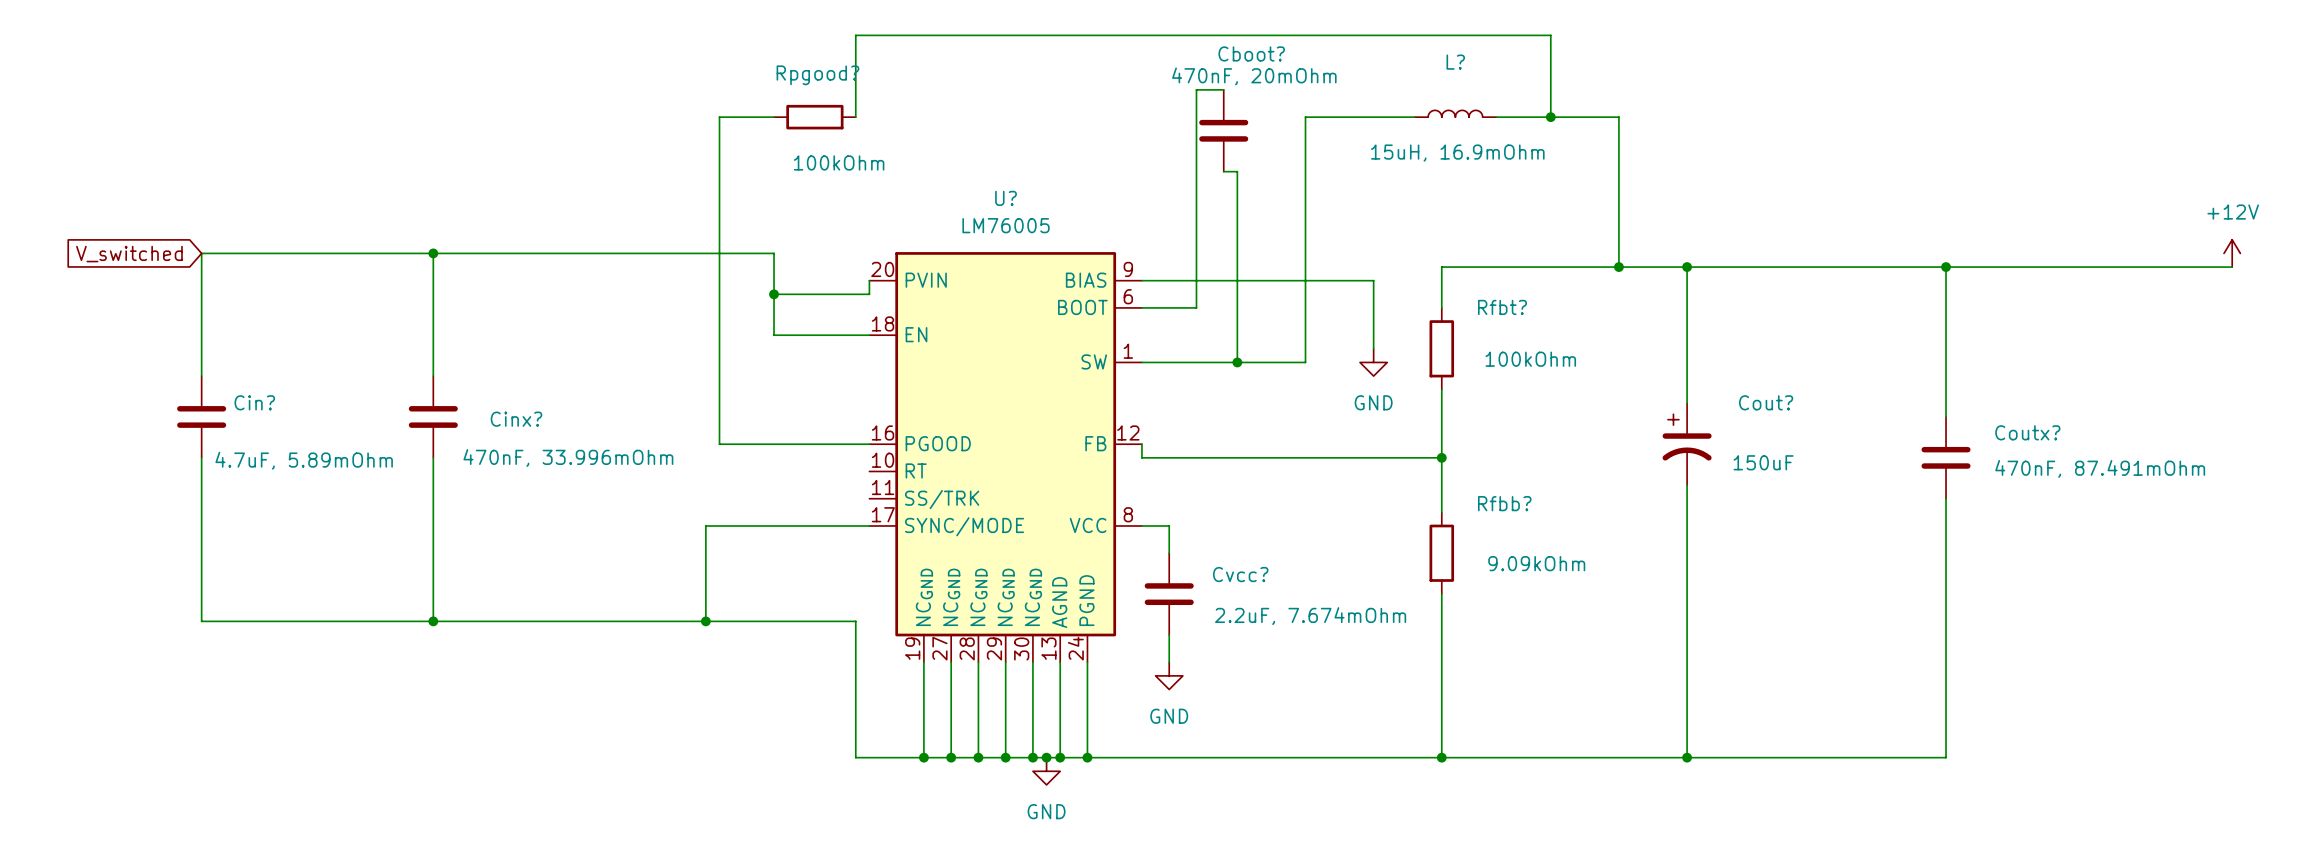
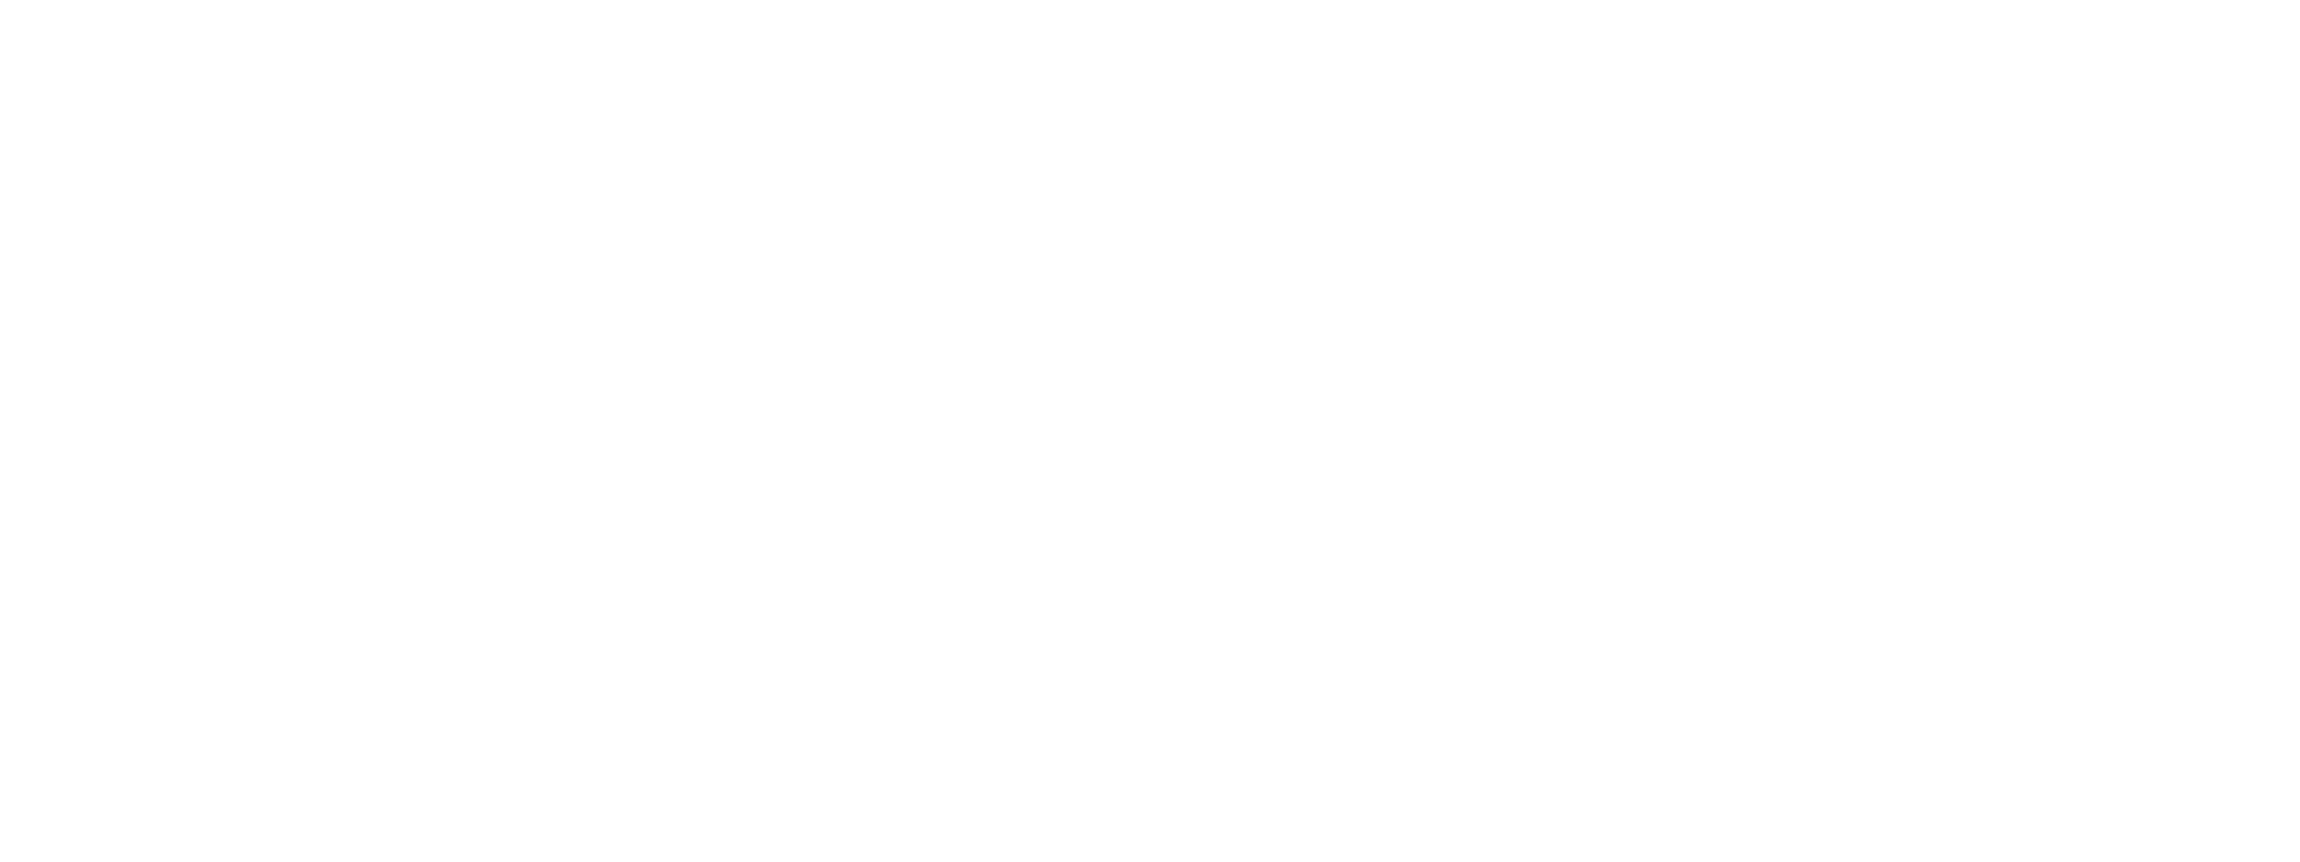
wire: (1223, 89) (1196, 89) (1196, 307) (1141, 307) -> none
L?: 15uH, 16.9mOhm (1455, 113) -> none
wire: (774, 117) (719, 117) (719, 444) (869, 444) -> none
Rpgood?: 100kOhm (814, 117) -> none
wire: (855, 117) (855, 35) (1550, 35) (1550, 117) -> none
wire: (1414, 117) (1305, 117) (1305, 362) (1141, 362) -> none
wire: (1496, 117) (1618, 117) (1618, 267) -> none
junction: (1550, 117) -> none
Cboot?: 470nF, 20mOhm (1223, 130) -> none
wire: (1223, 171) (1237, 171) (1237, 362) -> none
wire: (433, 253) (433, 376) -> none
junction: (433, 253) -> none
power symbol: +12V (2232, 253) -> none
global label: V_switched (129, 254) -> none
junction: (1618, 267) -> none
wire: (1687, 267) (1687, 403) -> none
junction: (1687, 267) -> none
wire: (1946, 267) (1946, 416) -> none
junction: (1946, 267) -> none
wire: (2232, 267) (1441, 267) (1441, 307) -> none
wire: (869, 280) (869, 294) (774, 294) -> none
wire: (1141, 280) (1373, 280) (1373, 348) -> none
junction: (774, 294) -> none
wire: (869, 335) (774, 335) (774, 253) (201, 253) (201, 376) -> none
Rfbt?: 100kOhm (1441, 348) -> none
junction: (1237, 362) -> none
power symbol: GND (1373, 362) -> none
wire: (1441, 389) (1441, 512) -> none
Cin?: 4.7uF, 5.89mOhm (201, 416) -> none
Cinx?: 470nF, 33.996mOhm (433, 416) -> none
wire: (1141, 444) (1141, 457) (1441, 457) -> none
Cout?: 150uF (1687, 444) -> none
wire: (201, 457) (201, 621) (855, 621) (855, 757) (1946, 757) (1946, 498) -> none
wire: (433, 457) (433, 621) -> none
U?: LM76005 (1005, 457) -> none
junction: (1441, 457) -> none
Coutx?: 470nF, 87.491mOhm (1946, 457) -> none
wire: (1687, 485) (1687, 757) -> none
wire: (869, 525) (705, 525) (705, 621) -> none
wire: (1141, 525) (1169, 525) (1169, 553) -> none
Rfbb?: 9.09kOhm (1441, 553) -> none
Cvcc?: 2.2uF, 7.674mOhm (1169, 594) -> none
wire: (1441, 594) (1441, 757) -> none
junction: (433, 621) -> none
junction: (705, 621) -> none
wire: (1169, 635) (1169, 662) -> none
wire: (923, 662) (923, 757) -> none
wire: (951, 662) (951, 757) -> none
wire: (978, 662) (978, 757) -> none
wire: (1005, 662) (1005, 757) -> none
wire: (1032, 662) (1032, 757) -> none
wire: (1060, 662) (1060, 757) -> none
wire: (1087, 662) (1087, 757) -> none
power symbol: GND (1169, 675) -> none
junction: (923, 757) -> none
junction: (951, 757) -> none
junction: (978, 757) -> none
junction: (1005, 757) -> none
junction: (1032, 757) -> none
junction: (1046, 757) -> none
junction: (1060, 757) -> none
junction: (1087, 757) -> none
junction: (1441, 757) -> none
junction: (1687, 757) -> none
power symbol: GND (1046, 771) -> none

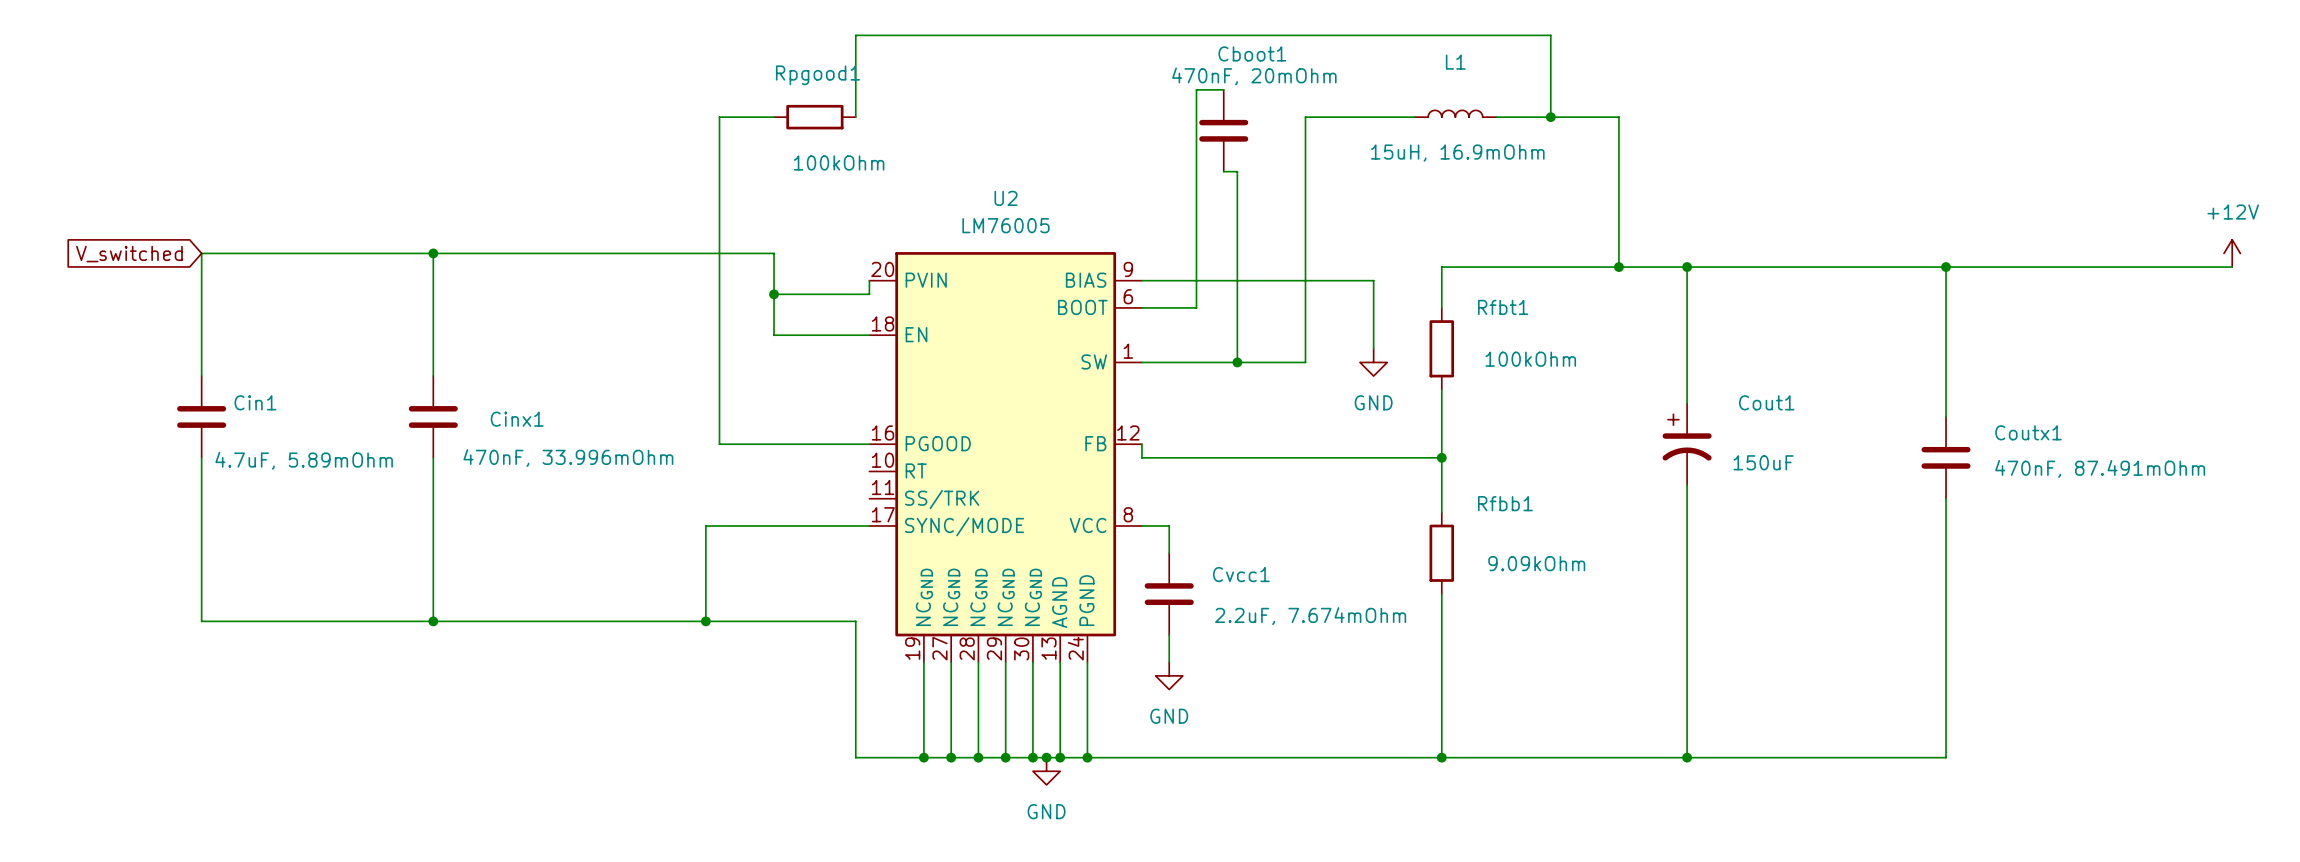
wire: none -> (1223, 89) (1196, 89) (1196, 307) (1141, 307)
L1: none -> 15uH, 16.9mOhm (1455, 113)
wire: none -> (774, 117) (719, 117) (719, 444) (869, 444)
Rpgood1: none -> 100kOhm (814, 117)
wire: none -> (855, 117) (855, 35) (1550, 35) (1550, 117)
wire: none -> (1414, 117) (1305, 117) (1305, 362) (1141, 362)
wire: none -> (1496, 117) (1618, 117) (1618, 267)
junction: none -> (1550, 117)
Cboot1: none -> 470nF, 20mOhm (1223, 130)
wire: none -> (1223, 171) (1237, 171) (1237, 362)
wire: none -> (433, 253) (433, 376)
junction: none -> (433, 253)
power symbol: none -> +12V (2232, 253)
global label: none -> V_switched (129, 254)
junction: none -> (1618, 267)
wire: none -> (1687, 267) (1687, 403)
junction: none -> (1687, 267)
wire: none -> (1946, 267) (1946, 416)
junction: none -> (1946, 267)
wire: none -> (2232, 267) (1441, 267) (1441, 307)
wire: none -> (869, 280) (869, 294) (774, 294)
wire: none -> (1141, 280) (1373, 280) (1373, 348)
junction: none -> (774, 294)
wire: none -> (869, 335) (774, 335) (774, 253) (201, 253) (201, 376)
Rfbt1: none -> 100kOhm (1441, 348)
junction: none -> (1237, 362)
power symbol: none -> GND (1373, 362)
wire: none -> (1441, 389) (1441, 512)
Cin1: none -> 4.7uF, 5.89mOhm (201, 416)
Cinx1: none -> 470nF, 33.996mOhm (433, 416)
wire: none -> (1141, 444) (1141, 457) (1441, 457)
Cout1: none -> 150uF (1687, 444)
wire: none -> (201, 457) (201, 621) (855, 621) (855, 757) (1946, 757) (1946, 498)
wire: none -> (433, 457) (433, 621)
U2: none -> LM76005 (1005, 457)
junction: none -> (1441, 457)
Coutx1: none -> 470nF, 87.491mOhm (1946, 457)
wire: none -> (1687, 485) (1687, 757)
wire: none -> (869, 525) (705, 525) (705, 621)
wire: none -> (1141, 525) (1169, 525) (1169, 553)
Rfbb1: none -> 9.09kOhm (1441, 553)
Cvcc1: none -> 2.2uF, 7.674mOhm (1169, 594)
wire: none -> (1441, 594) (1441, 757)
junction: none -> (433, 621)
junction: none -> (705, 621)
wire: none -> (1169, 635) (1169, 662)
wire: none -> (923, 662) (923, 757)
wire: none -> (951, 662) (951, 757)
wire: none -> (978, 662) (978, 757)
wire: none -> (1005, 662) (1005, 757)
wire: none -> (1032, 662) (1032, 757)
wire: none -> (1060, 662) (1060, 757)
wire: none -> (1087, 662) (1087, 757)
power symbol: none -> GND (1169, 675)
junction: none -> (923, 757)
junction: none -> (951, 757)
junction: none -> (978, 757)
junction: none -> (1005, 757)
junction: none -> (1032, 757)
junction: none -> (1046, 757)
junction: none -> (1060, 757)
junction: none -> (1087, 757)
junction: none -> (1441, 757)
junction: none -> (1687, 757)
power symbol: none -> GND (1046, 771)

